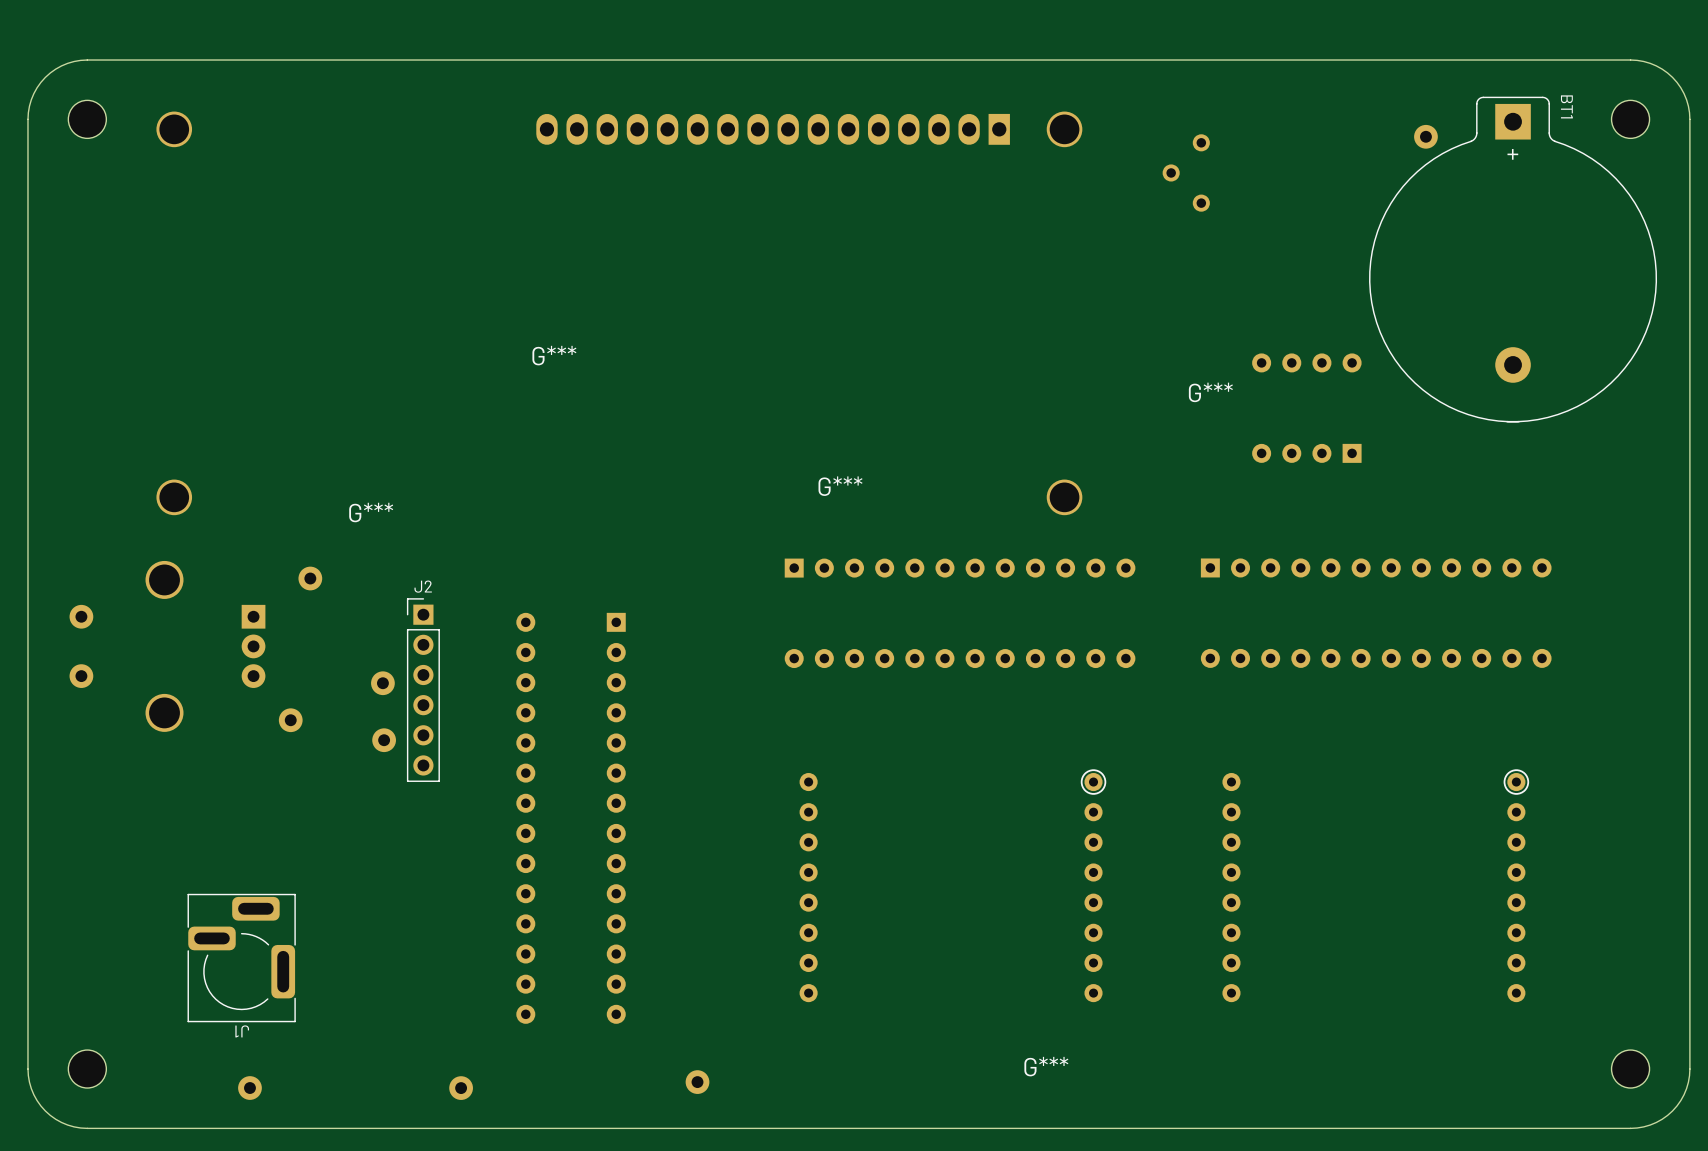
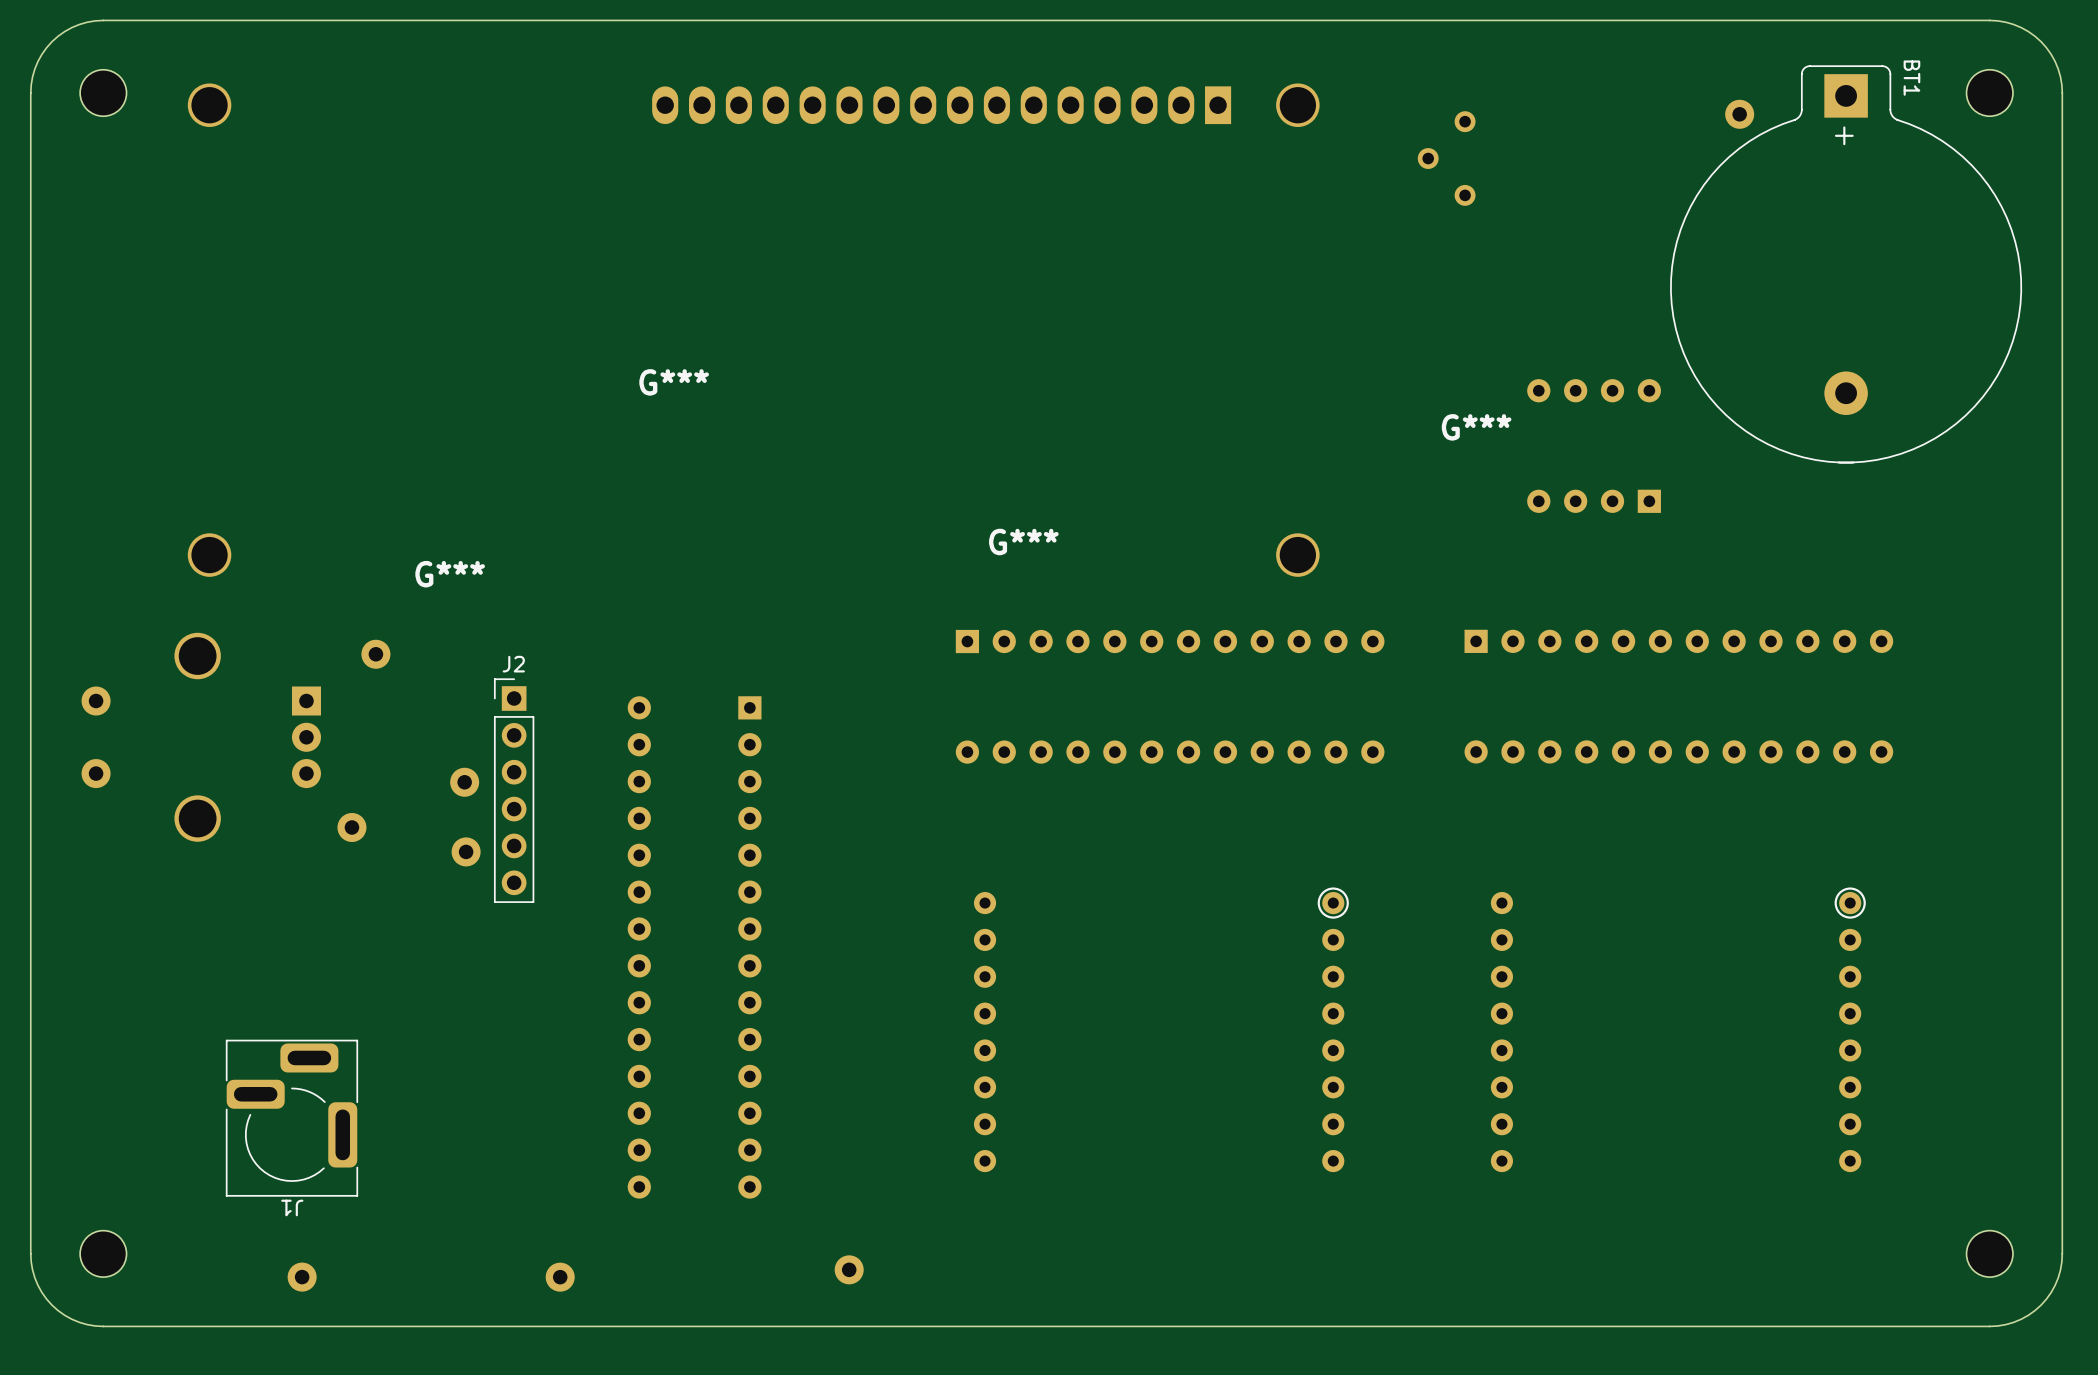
G***: (1046, 1066) -> none

